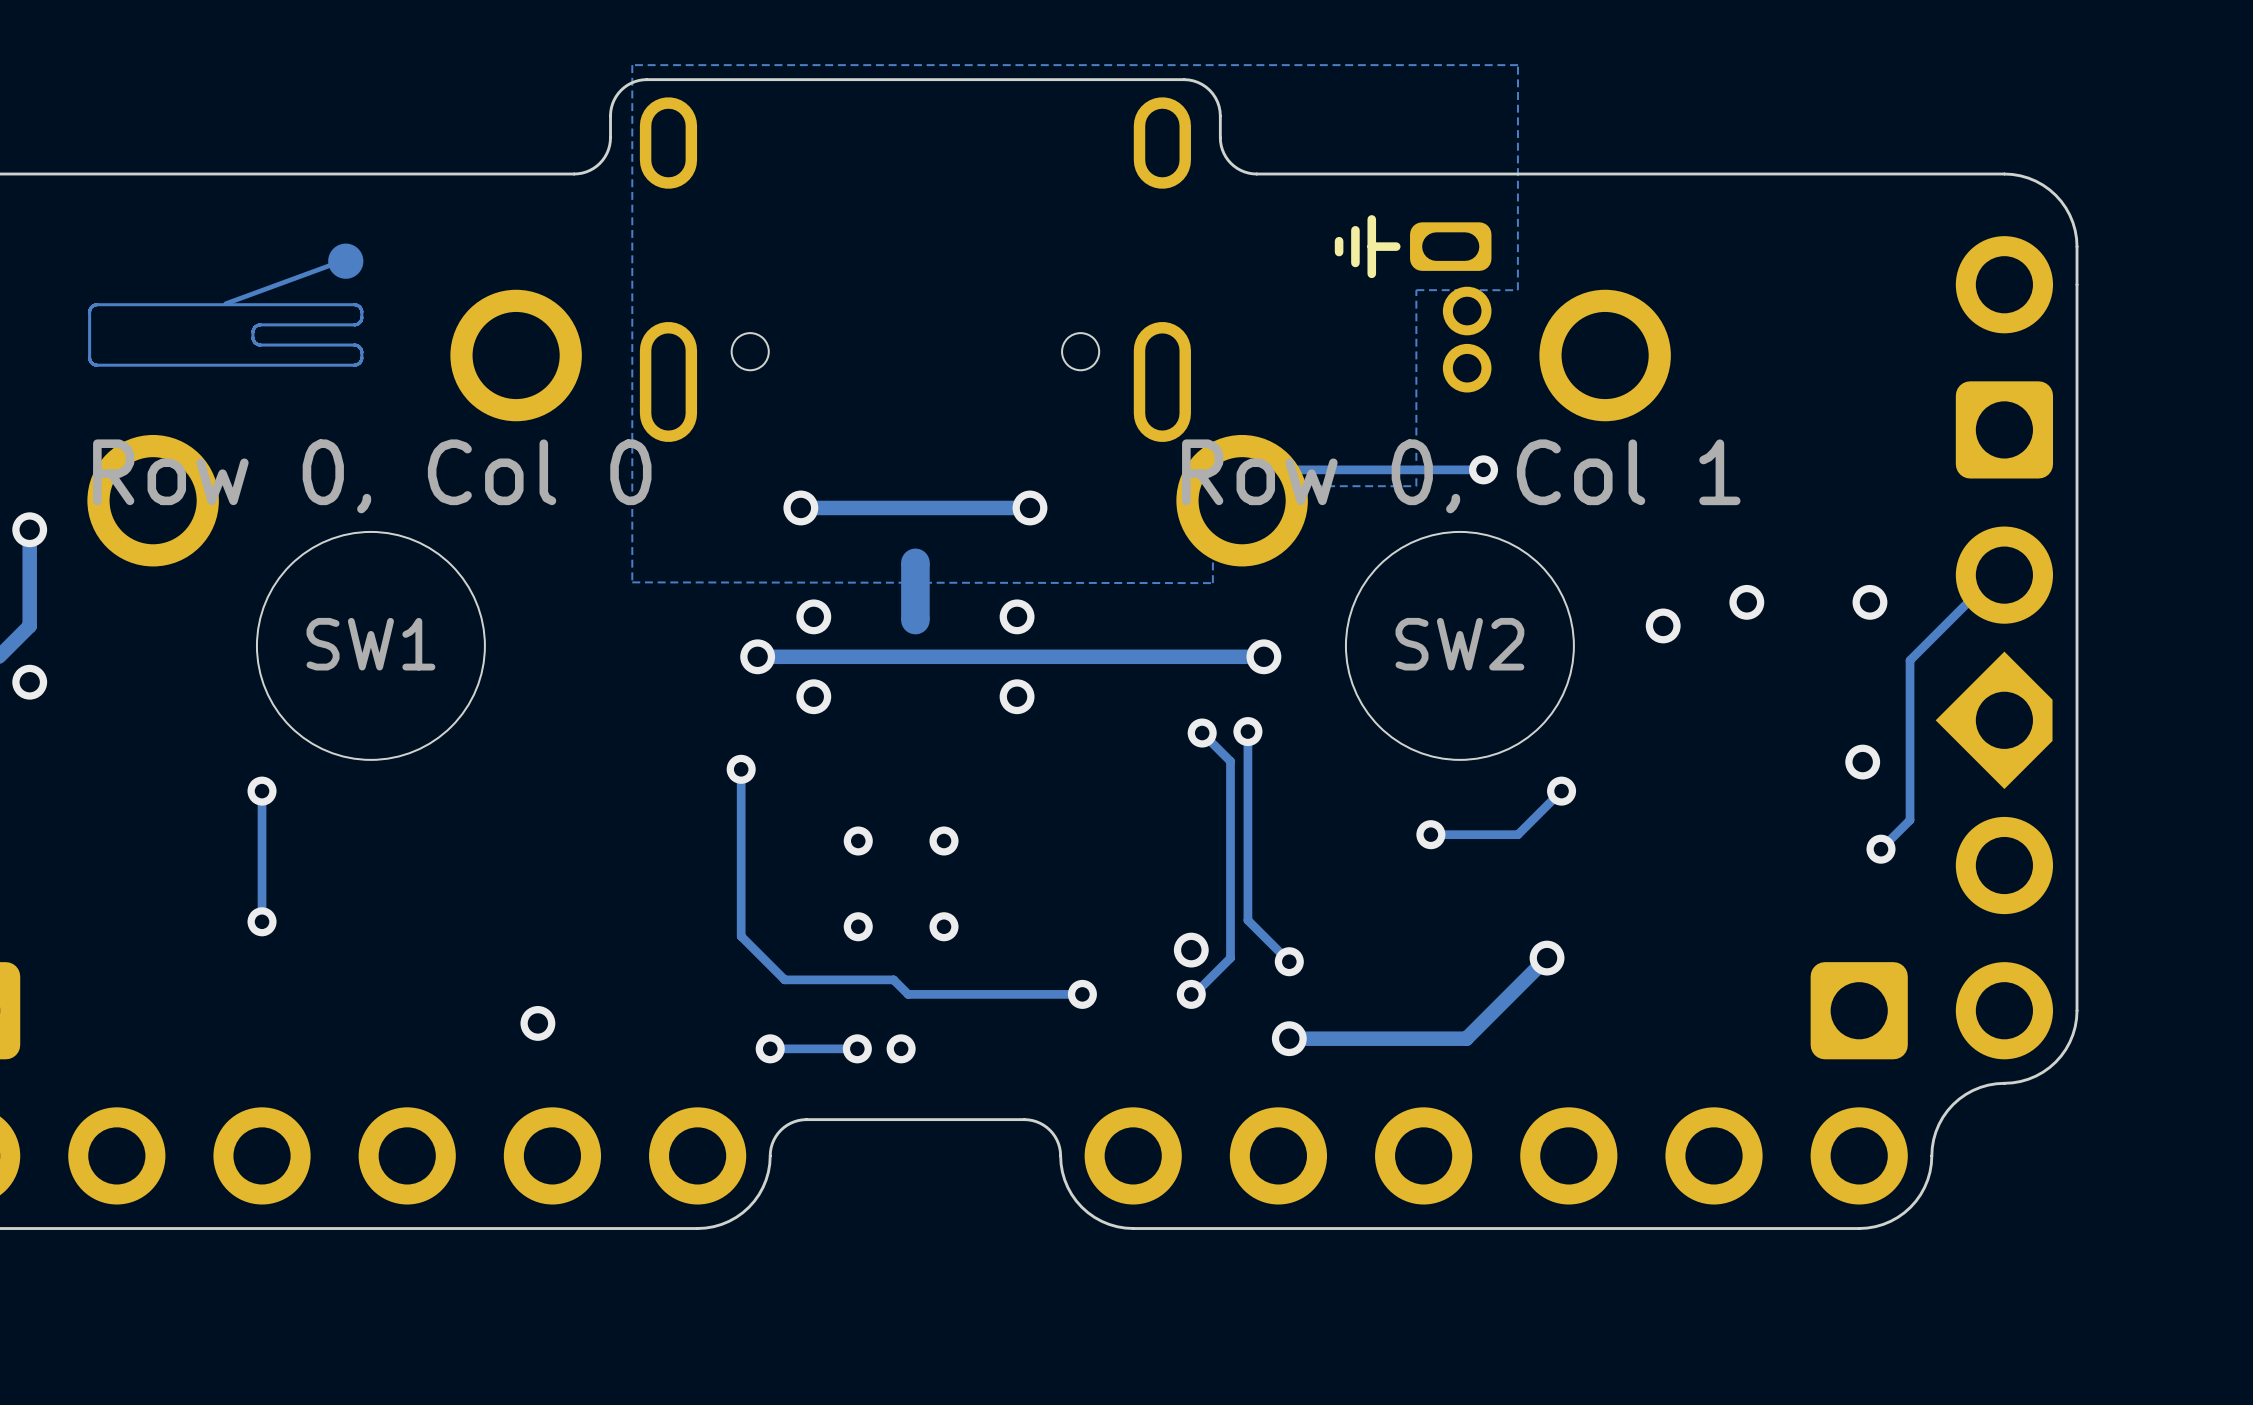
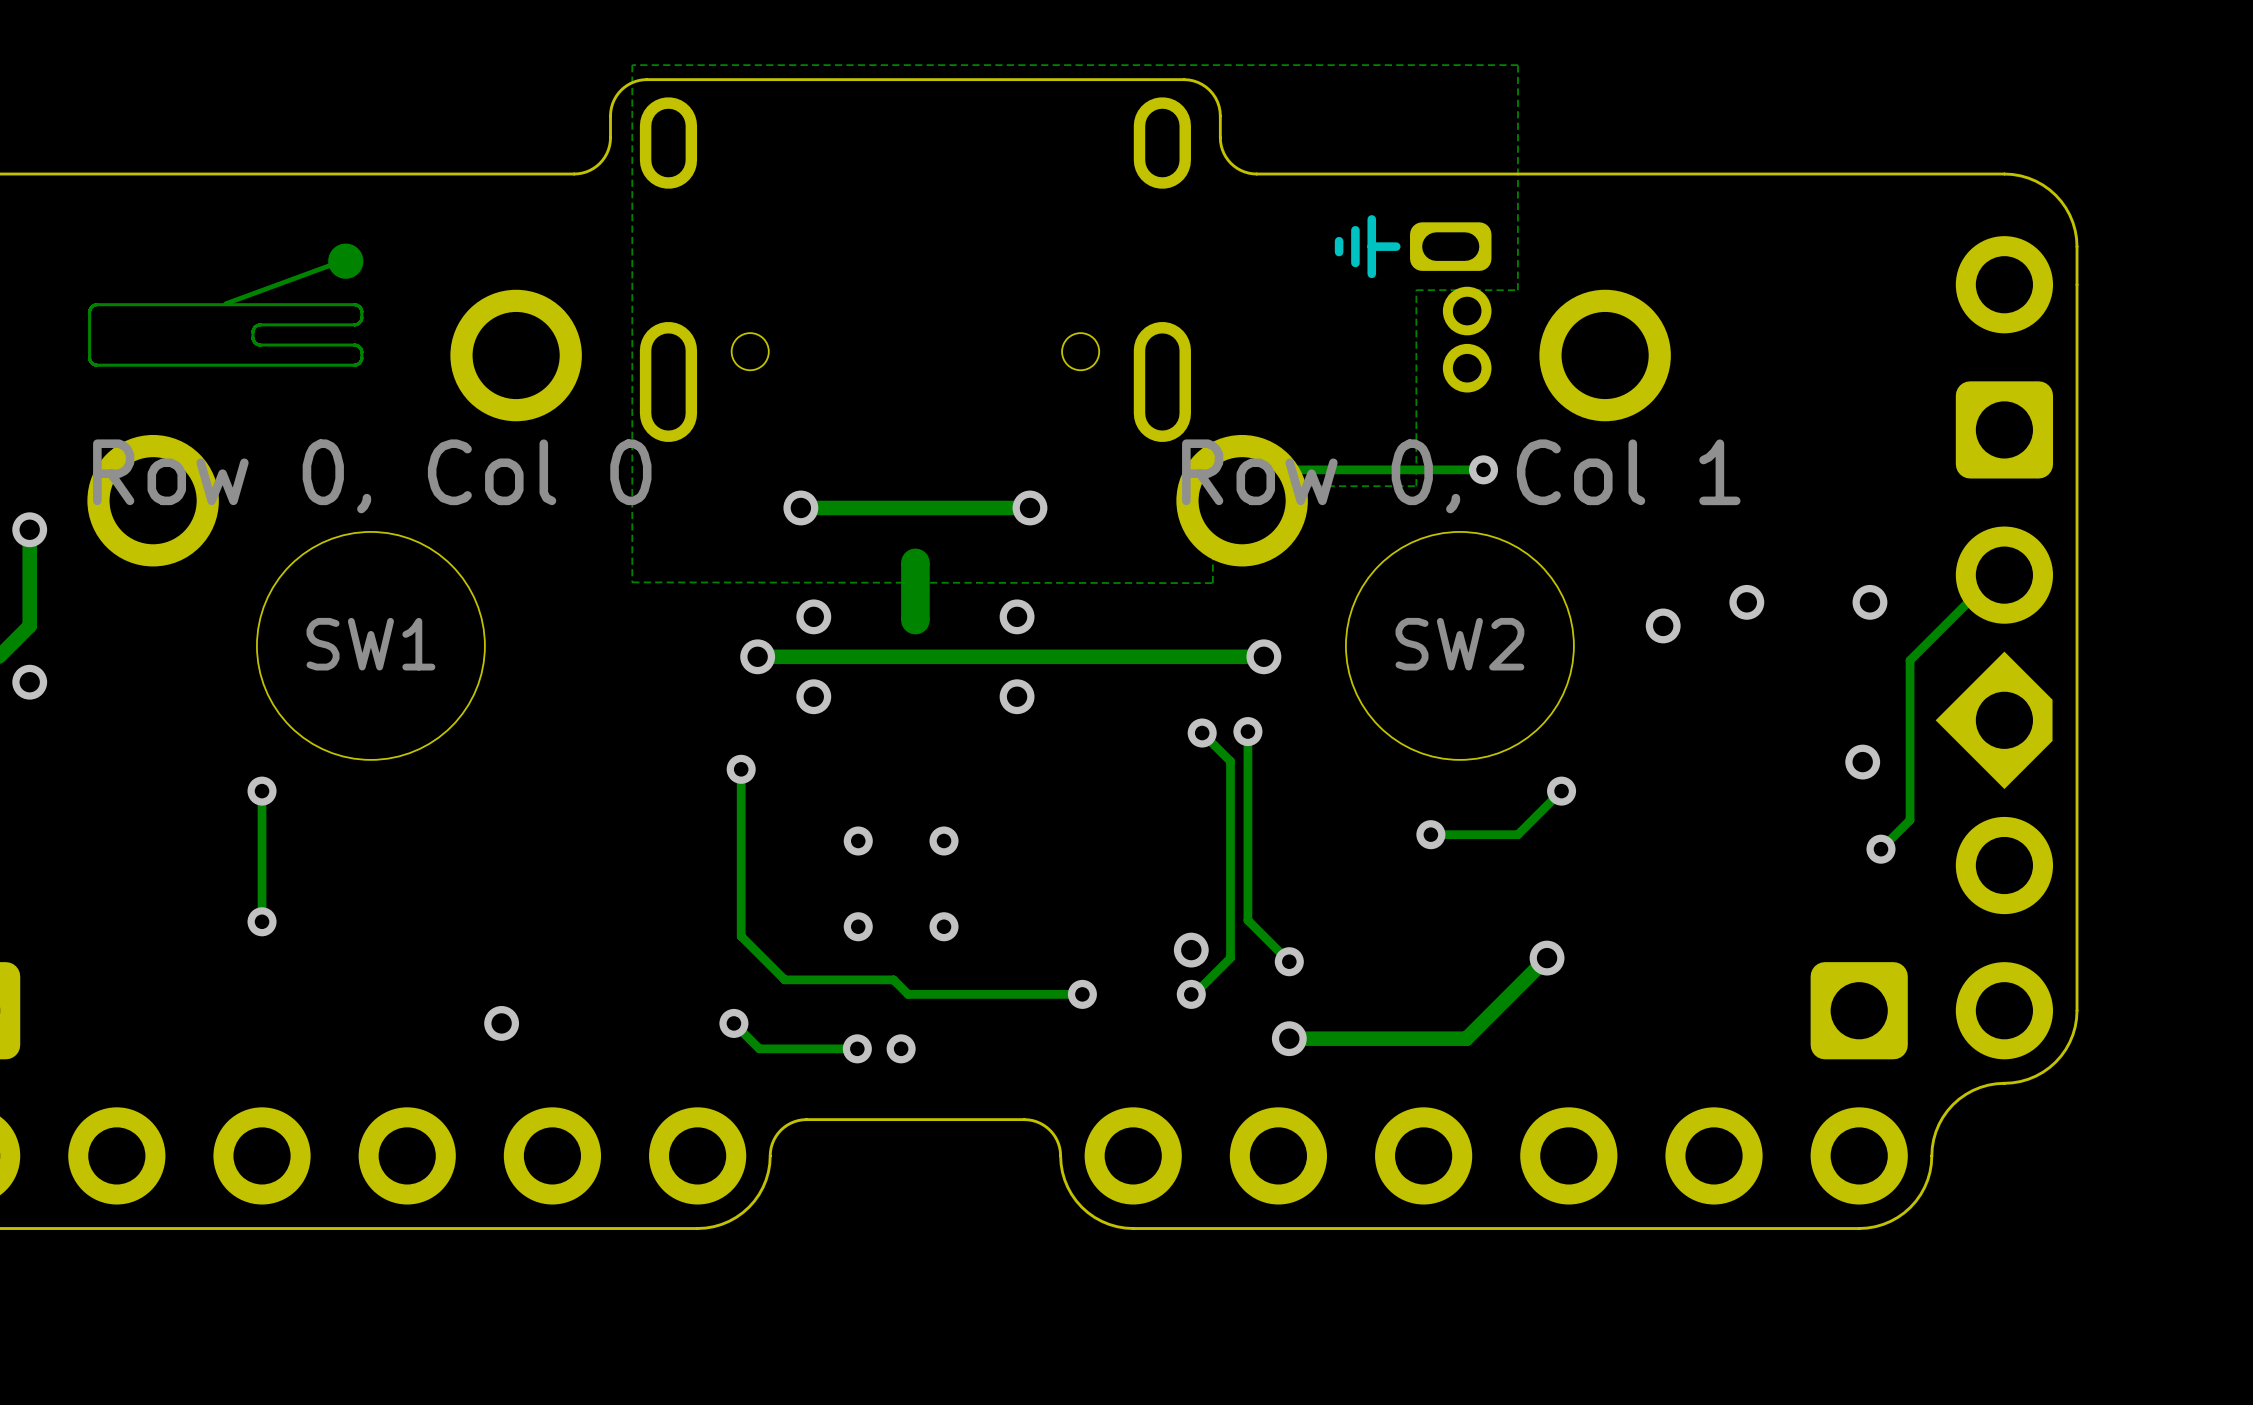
via position: (537, 1023) -> (501, 1023)
track: none -> (733, 1023) (759, 1048) (770, 1048)
via position: (770, 1048) -> (733, 1023)

